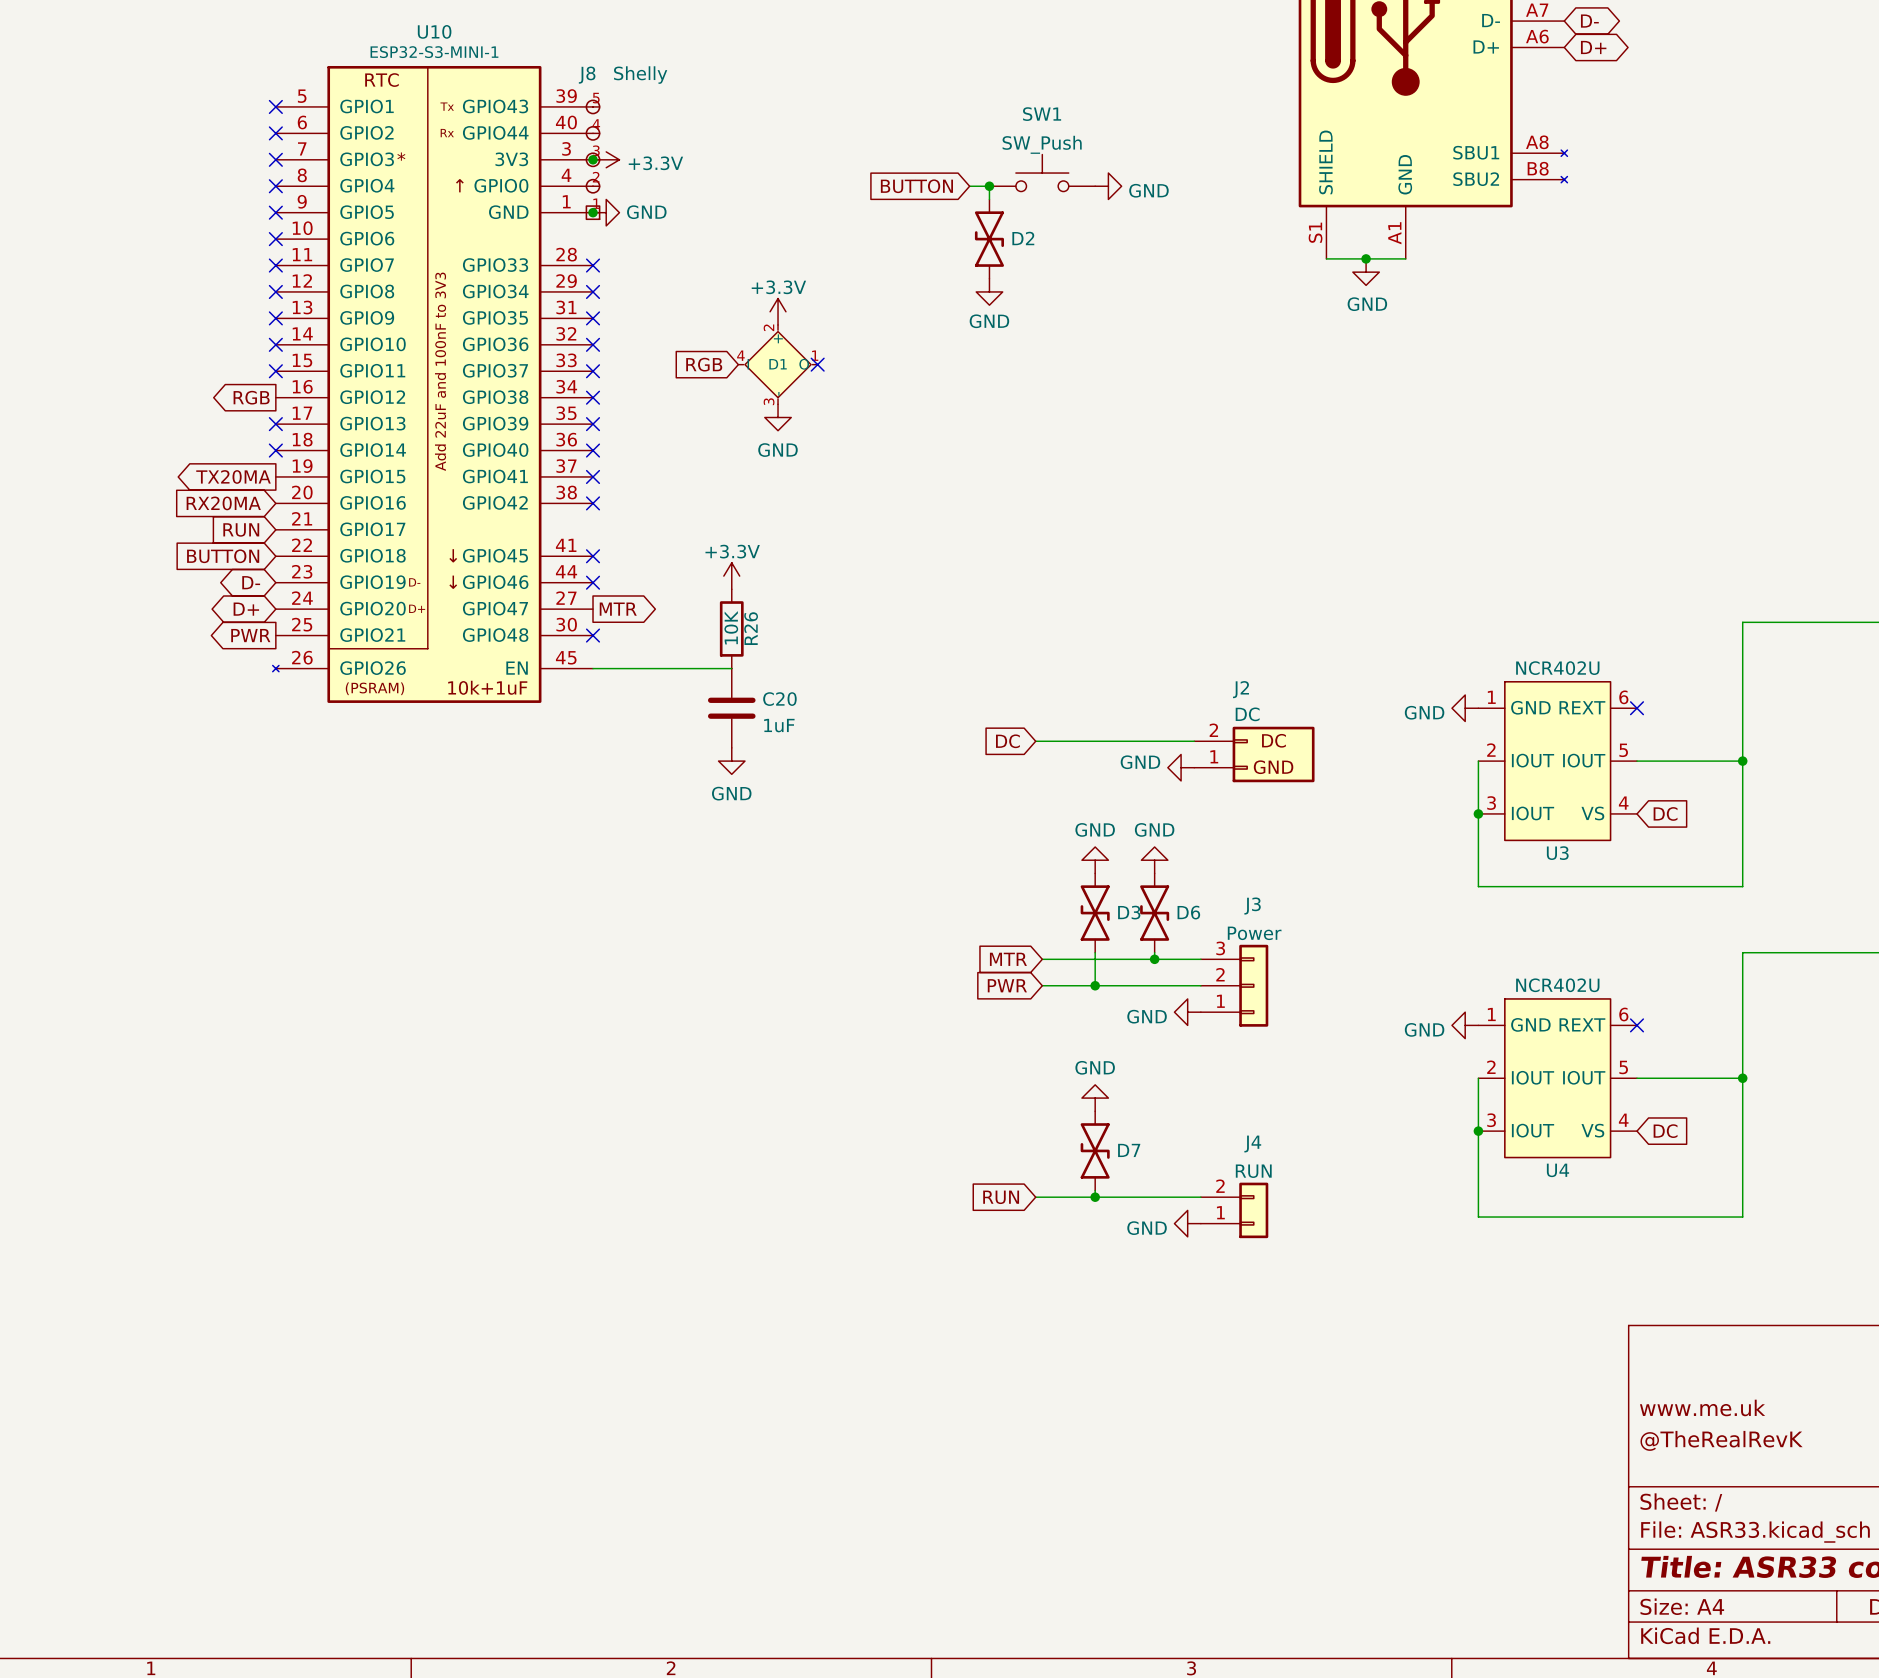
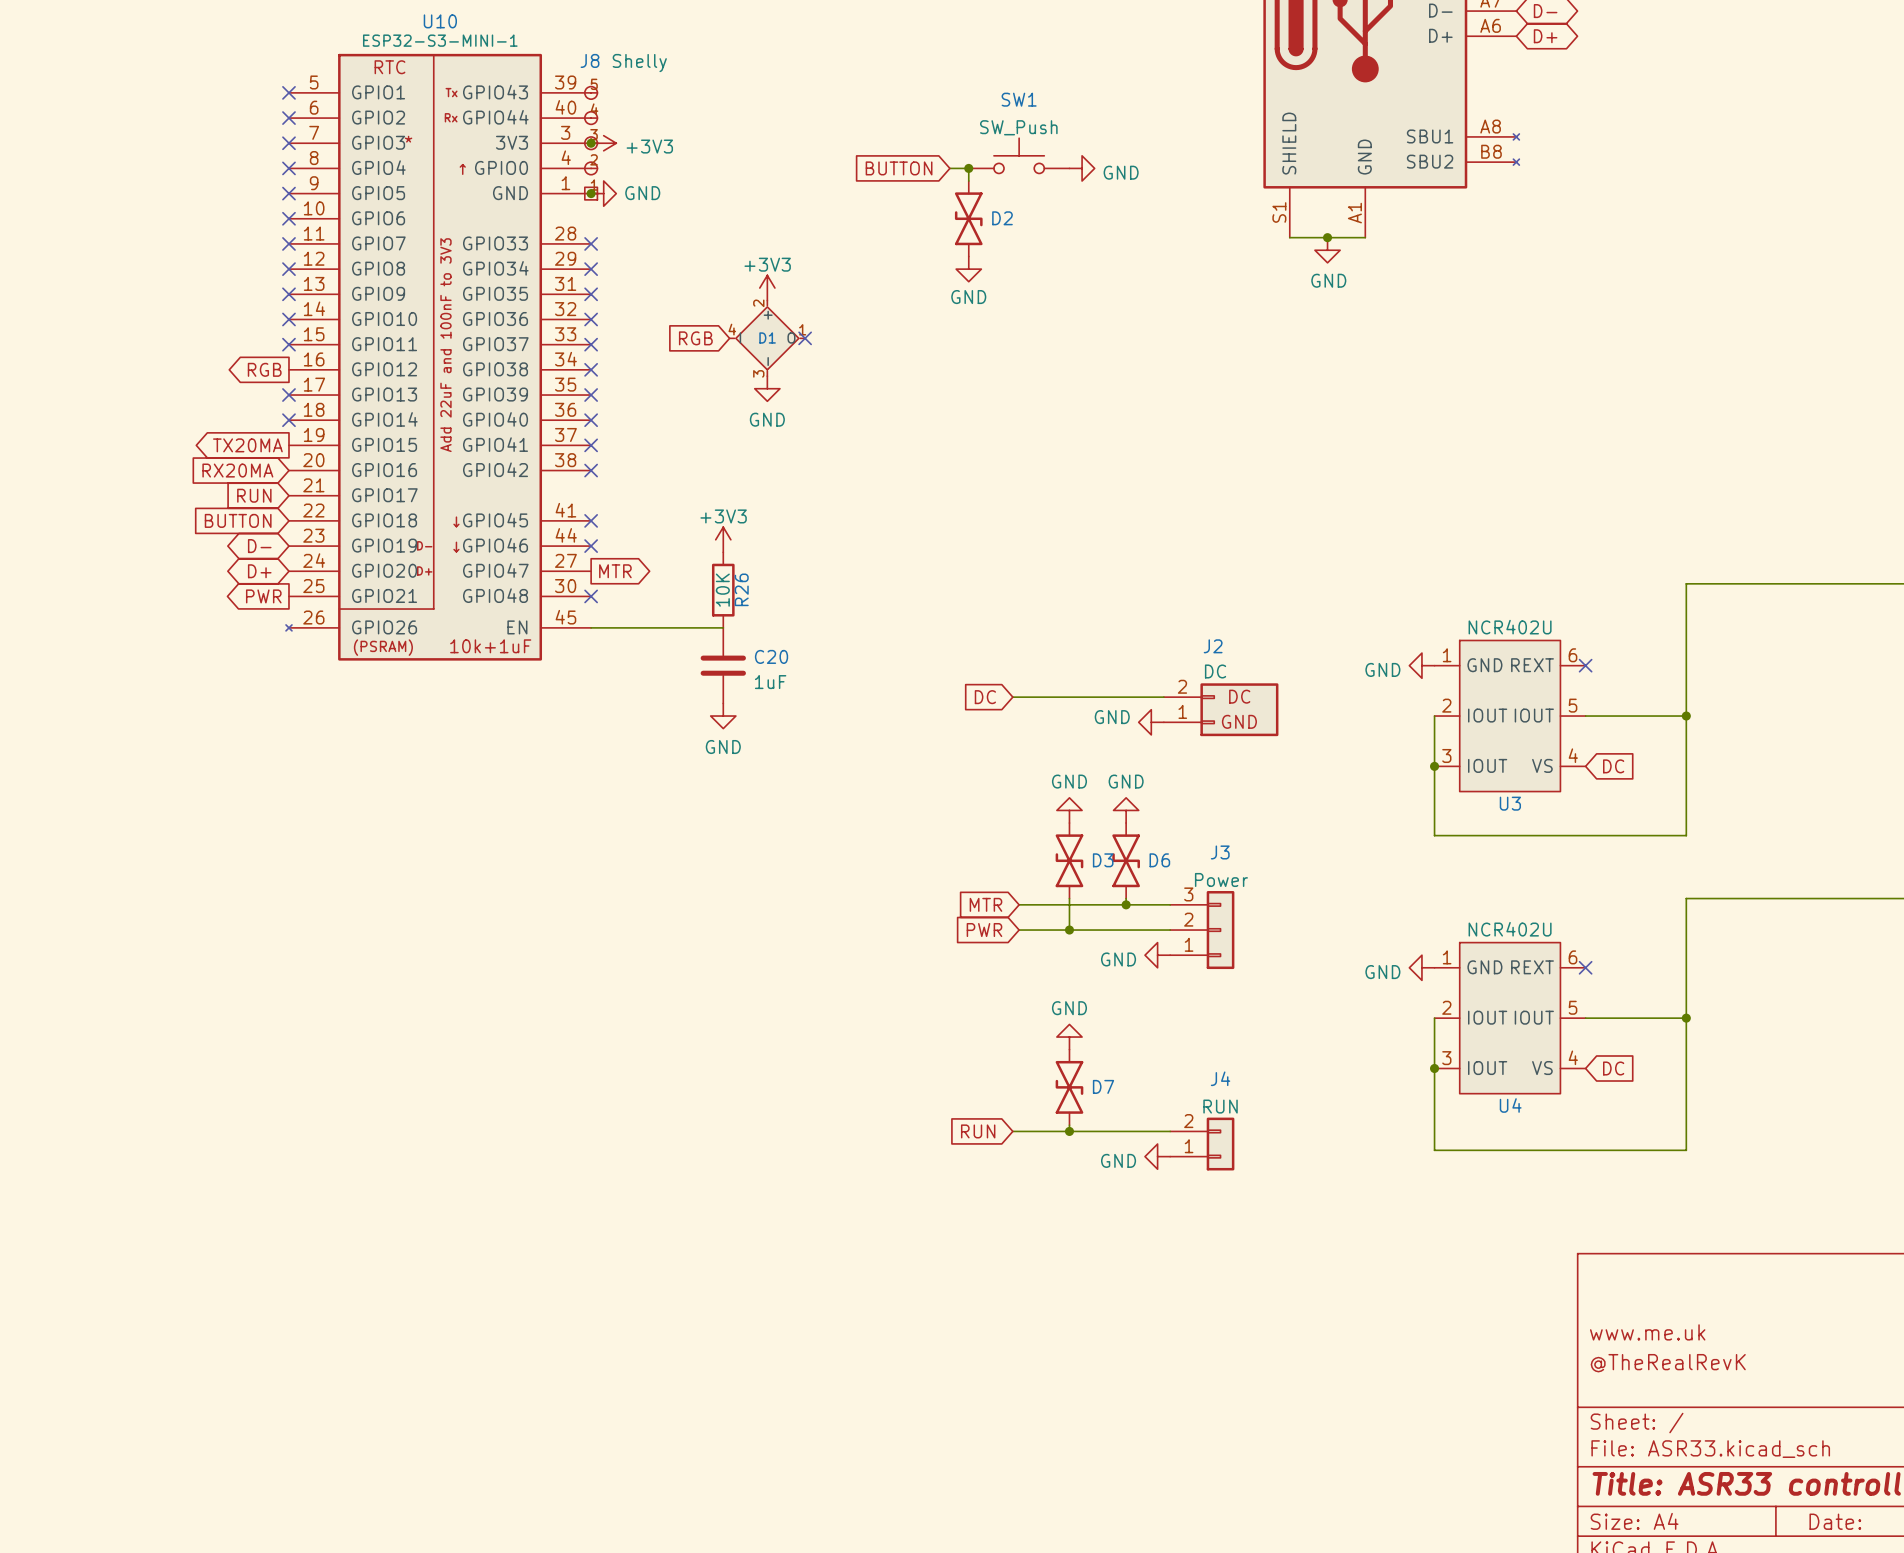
power symbol: +3.3V (606, 159) -> +3V3 (603, 143)
power symbol: +3.3V (778, 311) -> +3V3 (767, 288)
power symbol: +3.3V (731, 576) -> +3V3 (723, 539)

